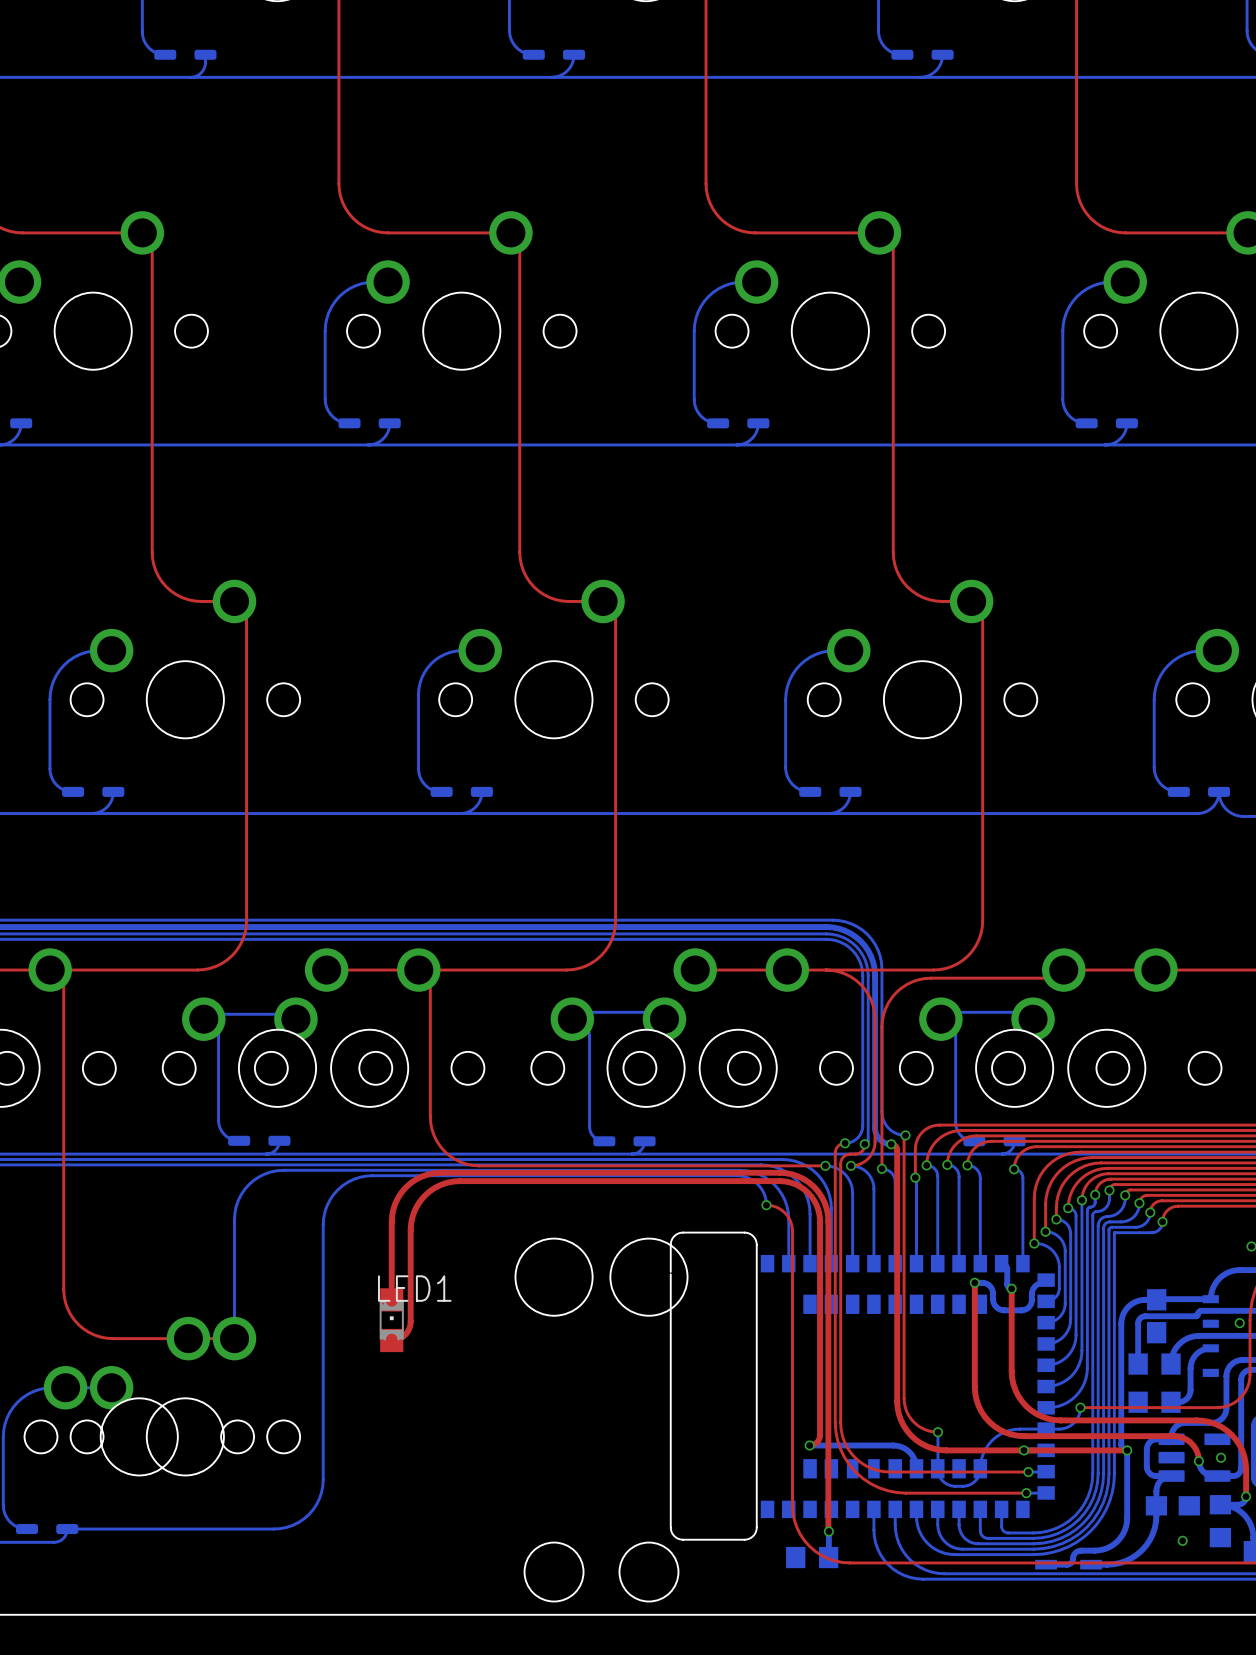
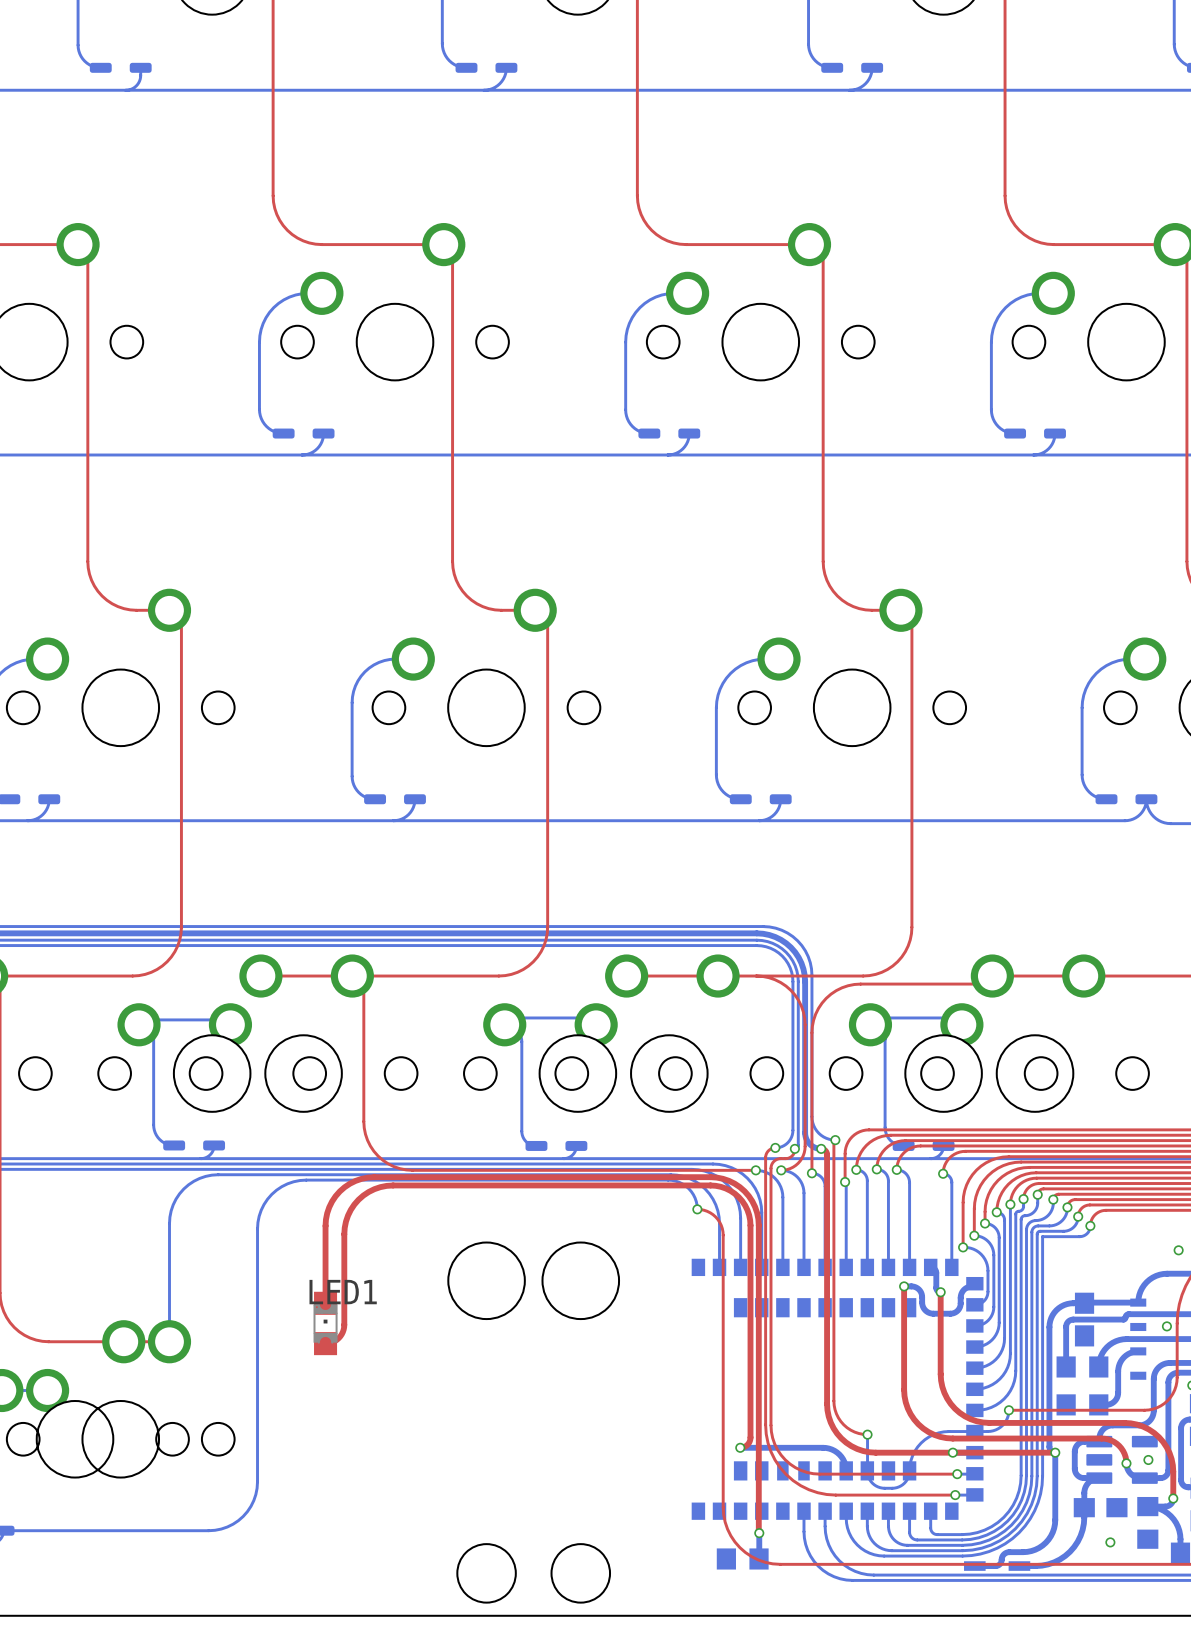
part: (862, 1386) -> none

